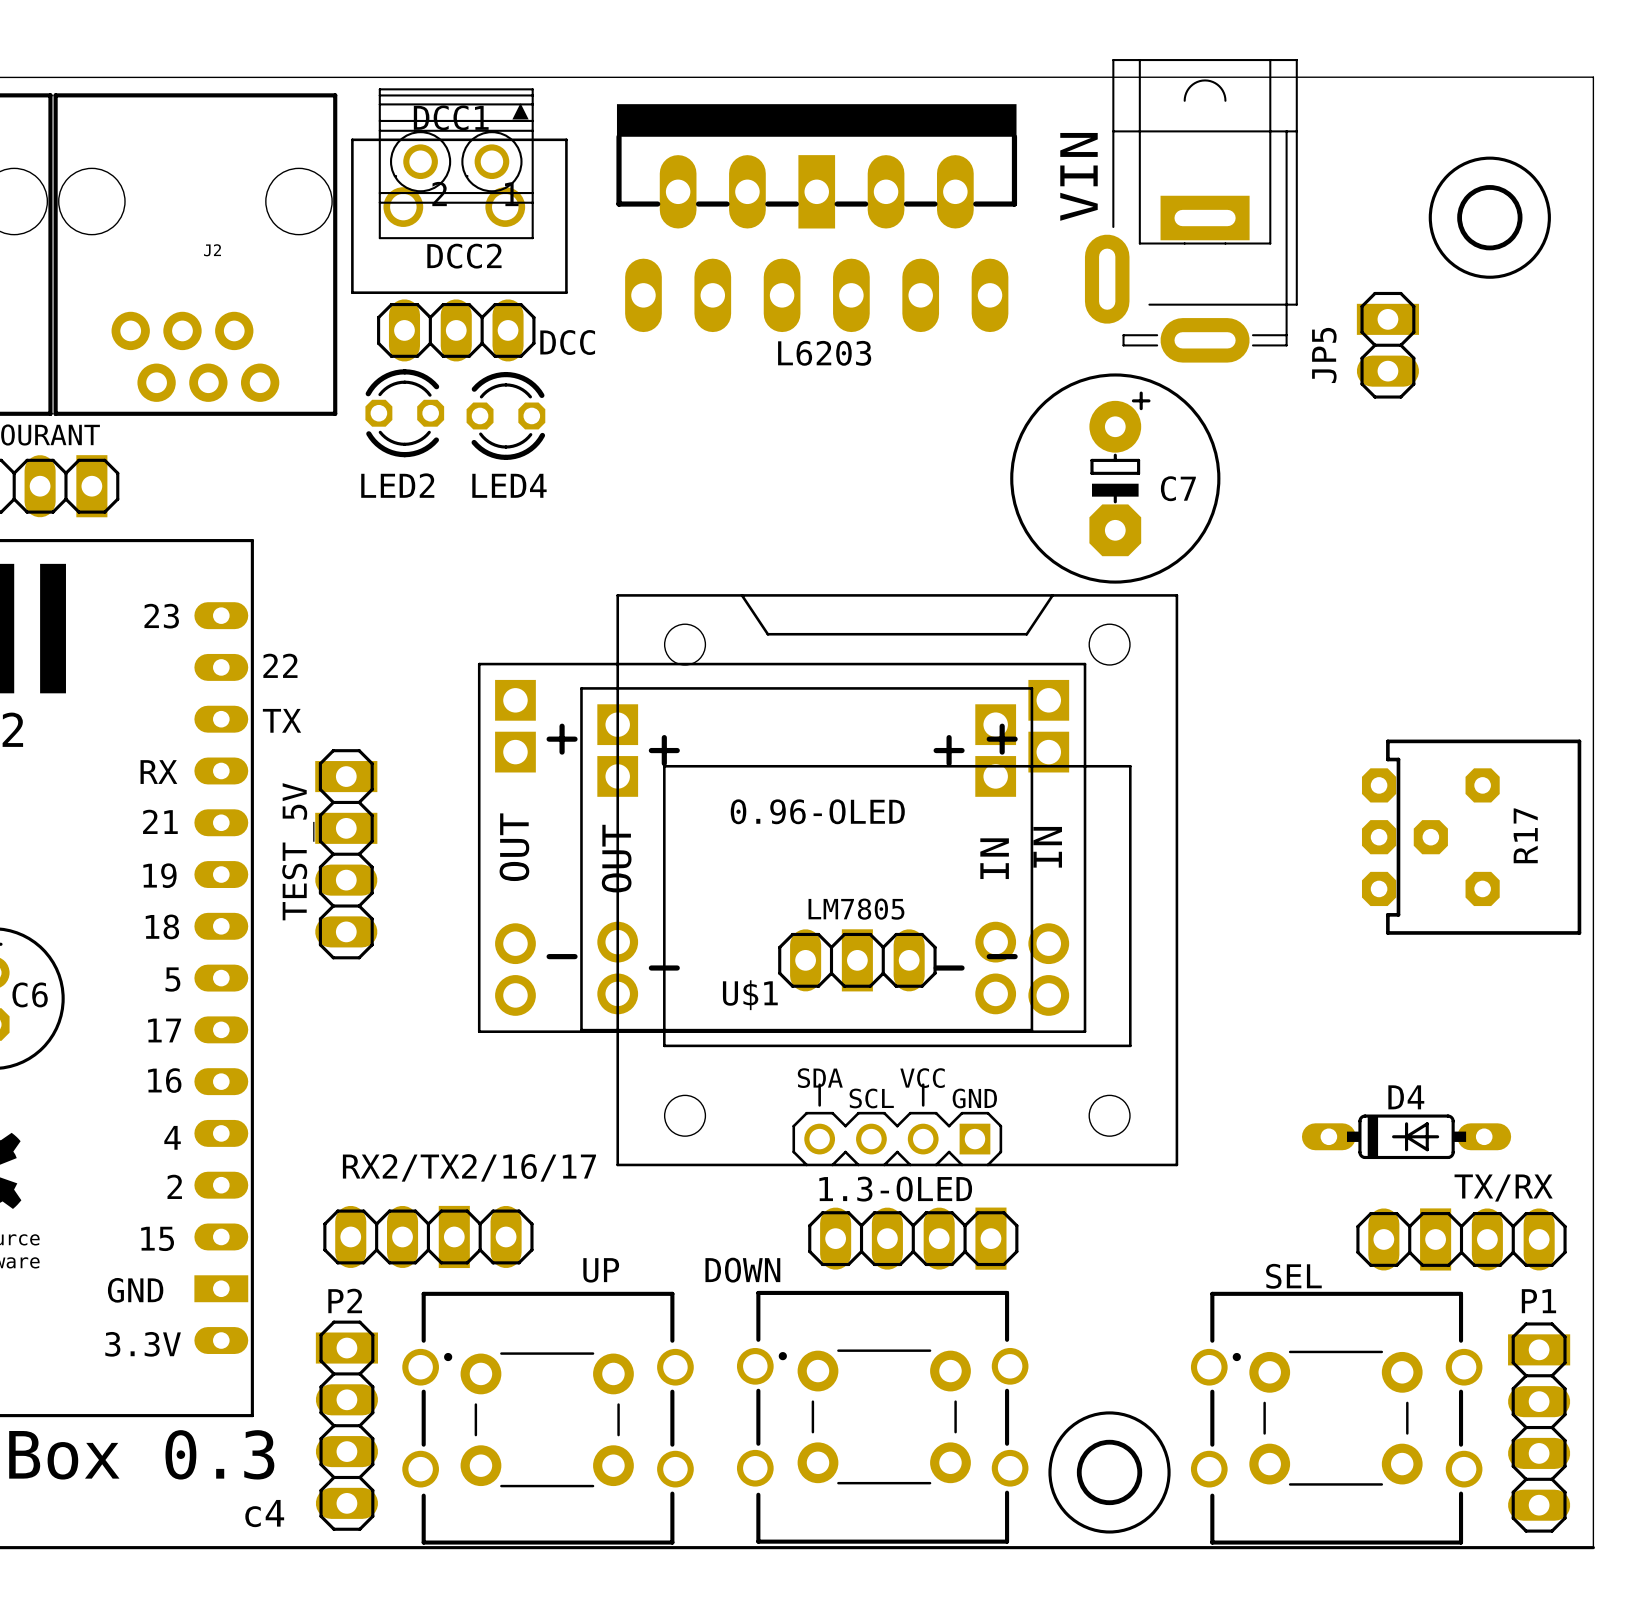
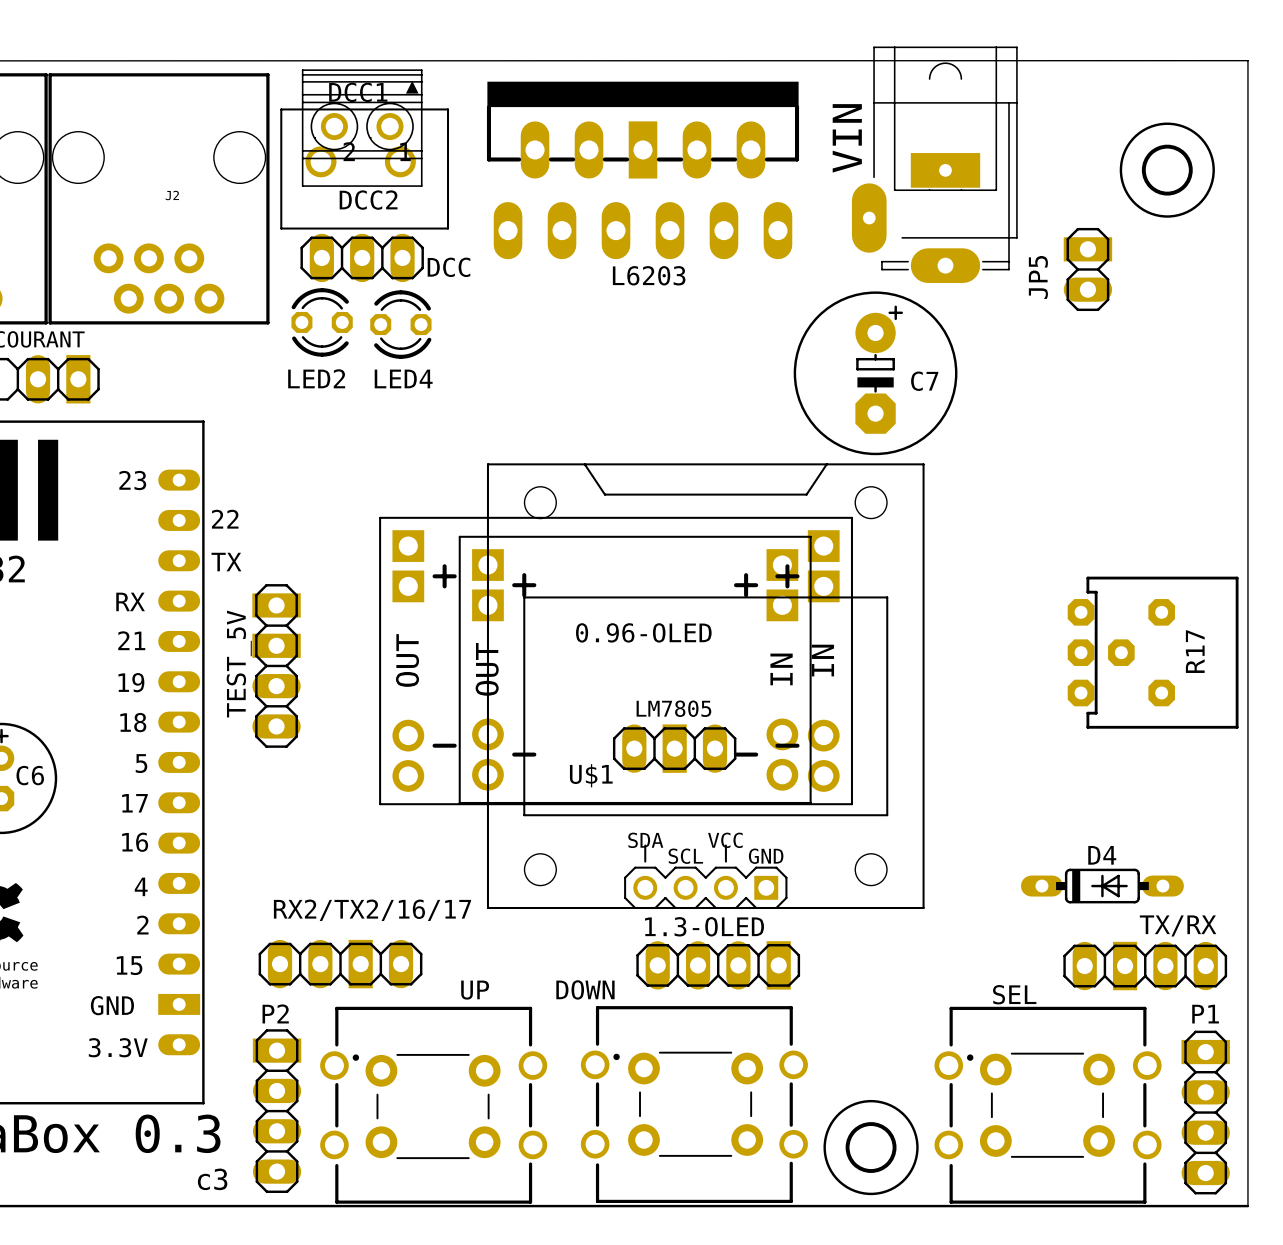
VIN footprint: [1084, 59, 1298, 363] -> [851, 46, 1018, 283]
text: c4 (264, 1513) -> c3 (212, 1179)

